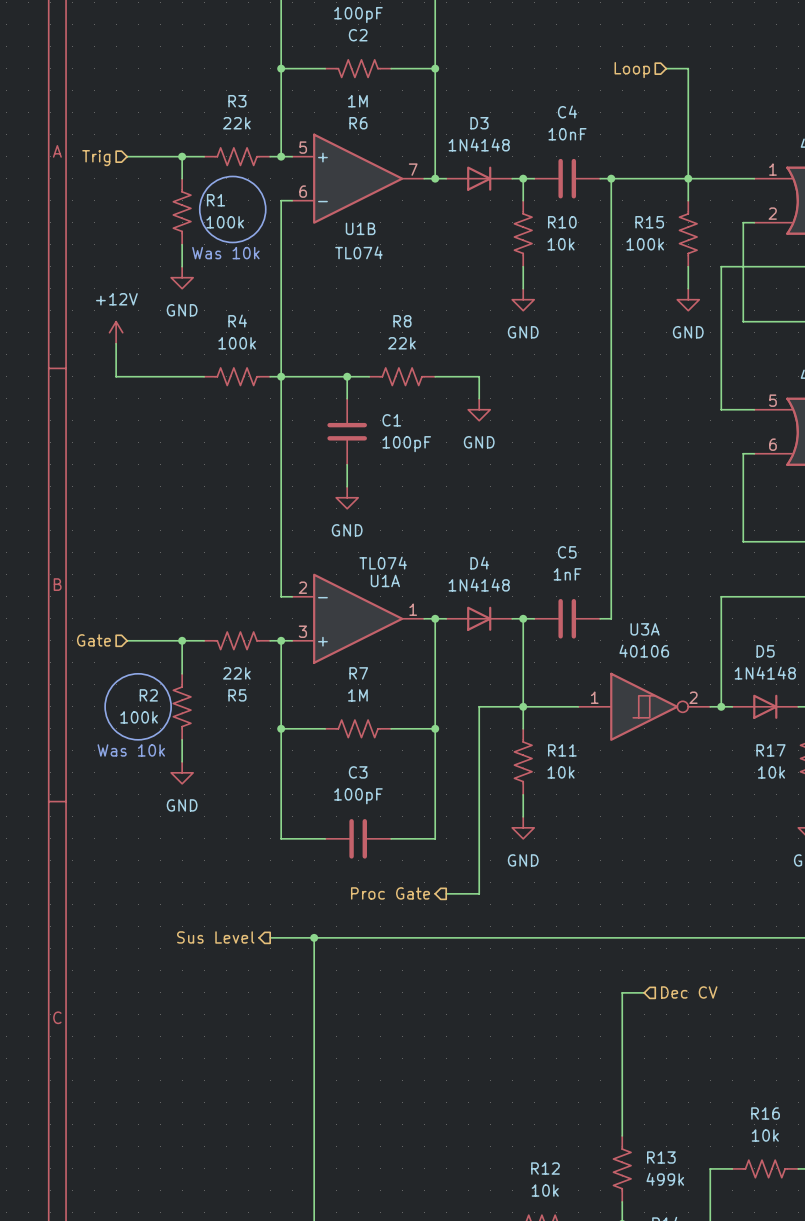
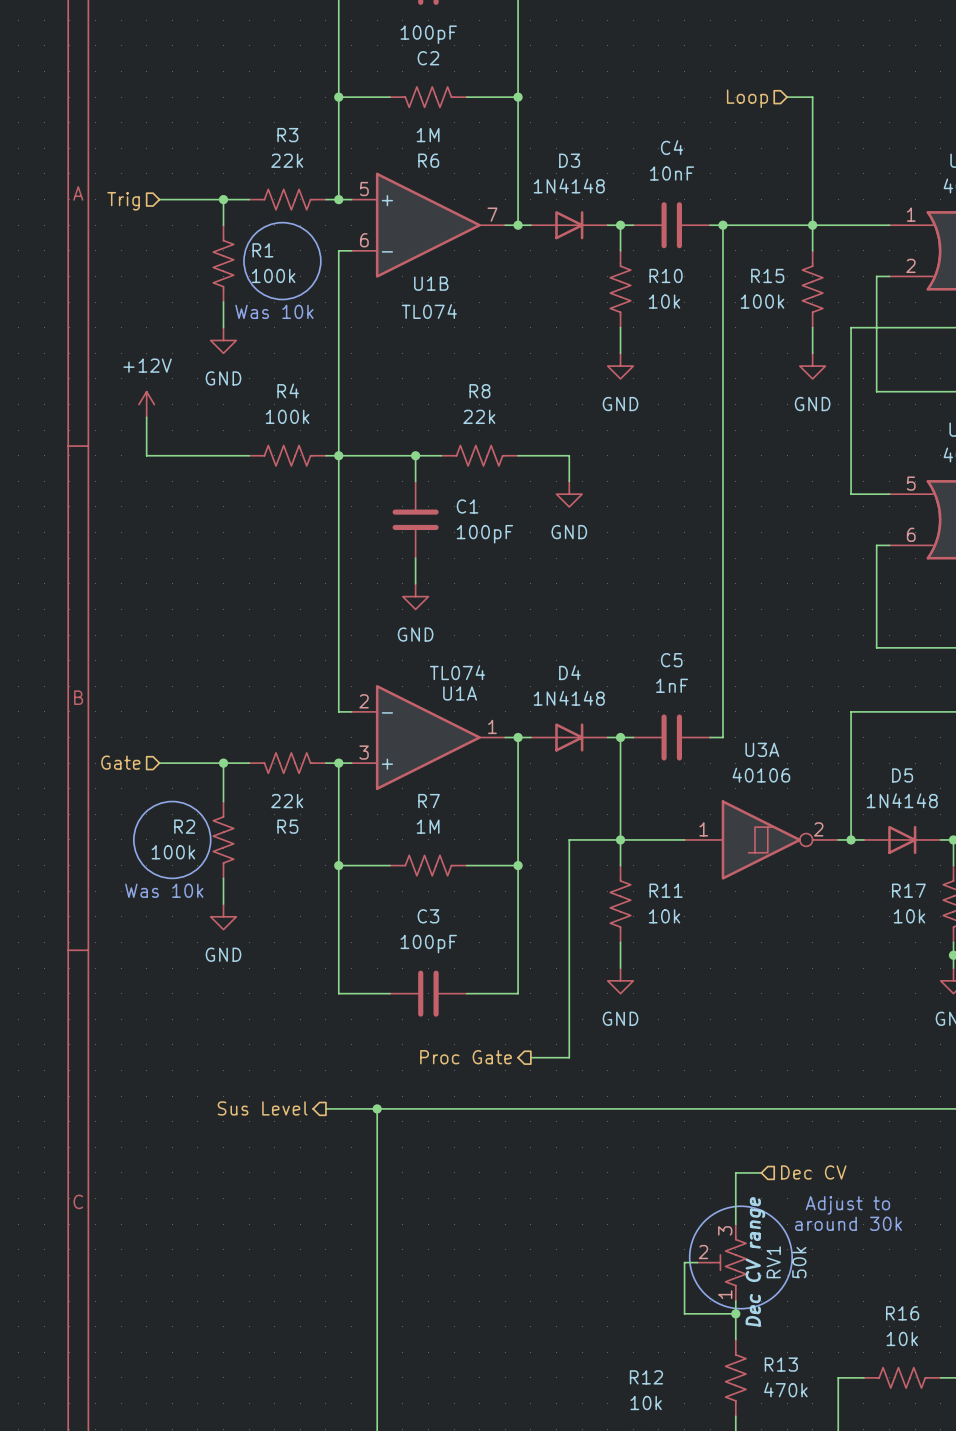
text: none -> Adjust to (847, 1205)
drawing: none -> [689, 1206, 793, 1309]
text: none -> around 30k (848, 1223)
wire: none -> (697, 1262) (684, 1262) (684, 1313) (735, 1313)
RV1: none -> 50k (721, 1262)
junction: none -> (735, 1313)
R13 value: 499k (665, 1179) -> 470k (785, 1389)

